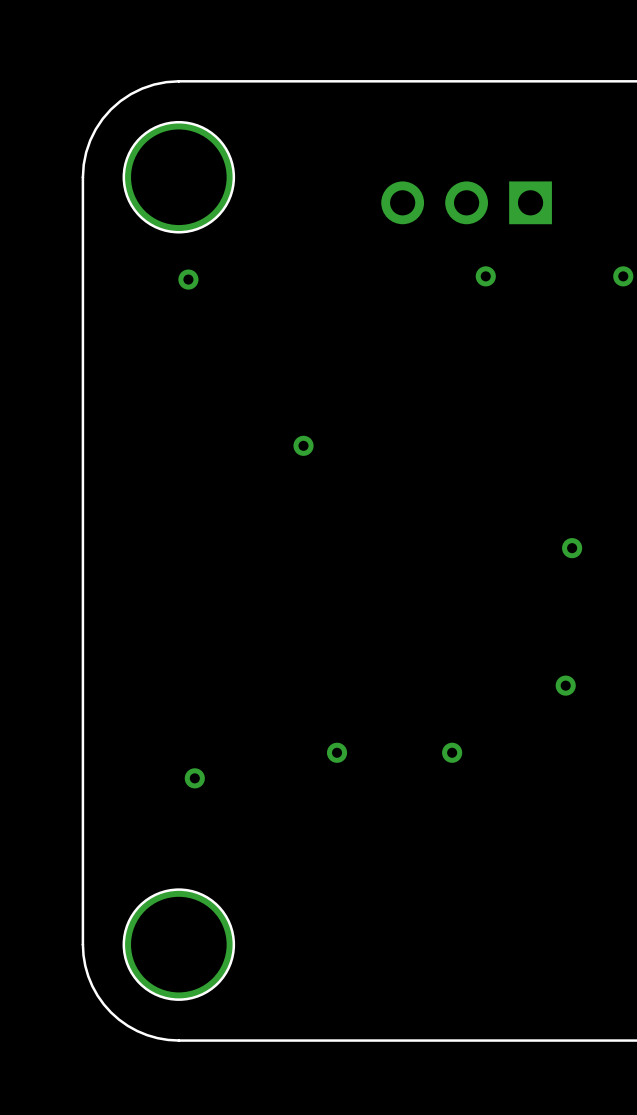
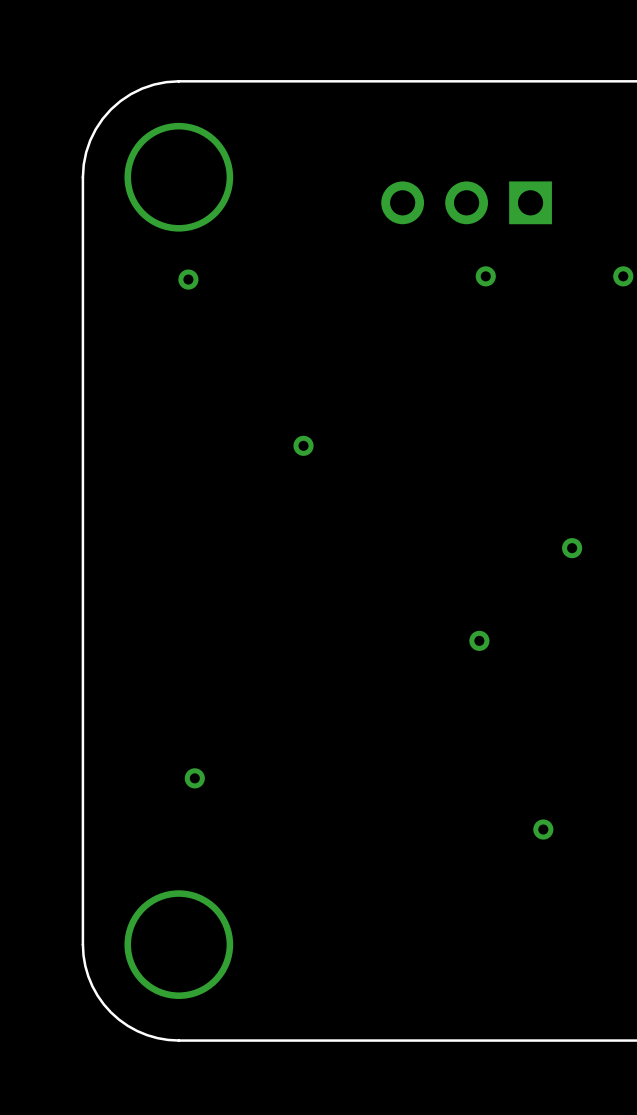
round board edge: [122, 120, 236, 234] -> none
via: none -> (479, 640)
via: (565, 685) -> none
via: (337, 752) -> none
via: (452, 752) -> none
via: none -> (543, 829)
round board edge: [122, 888, 236, 1001] -> none

